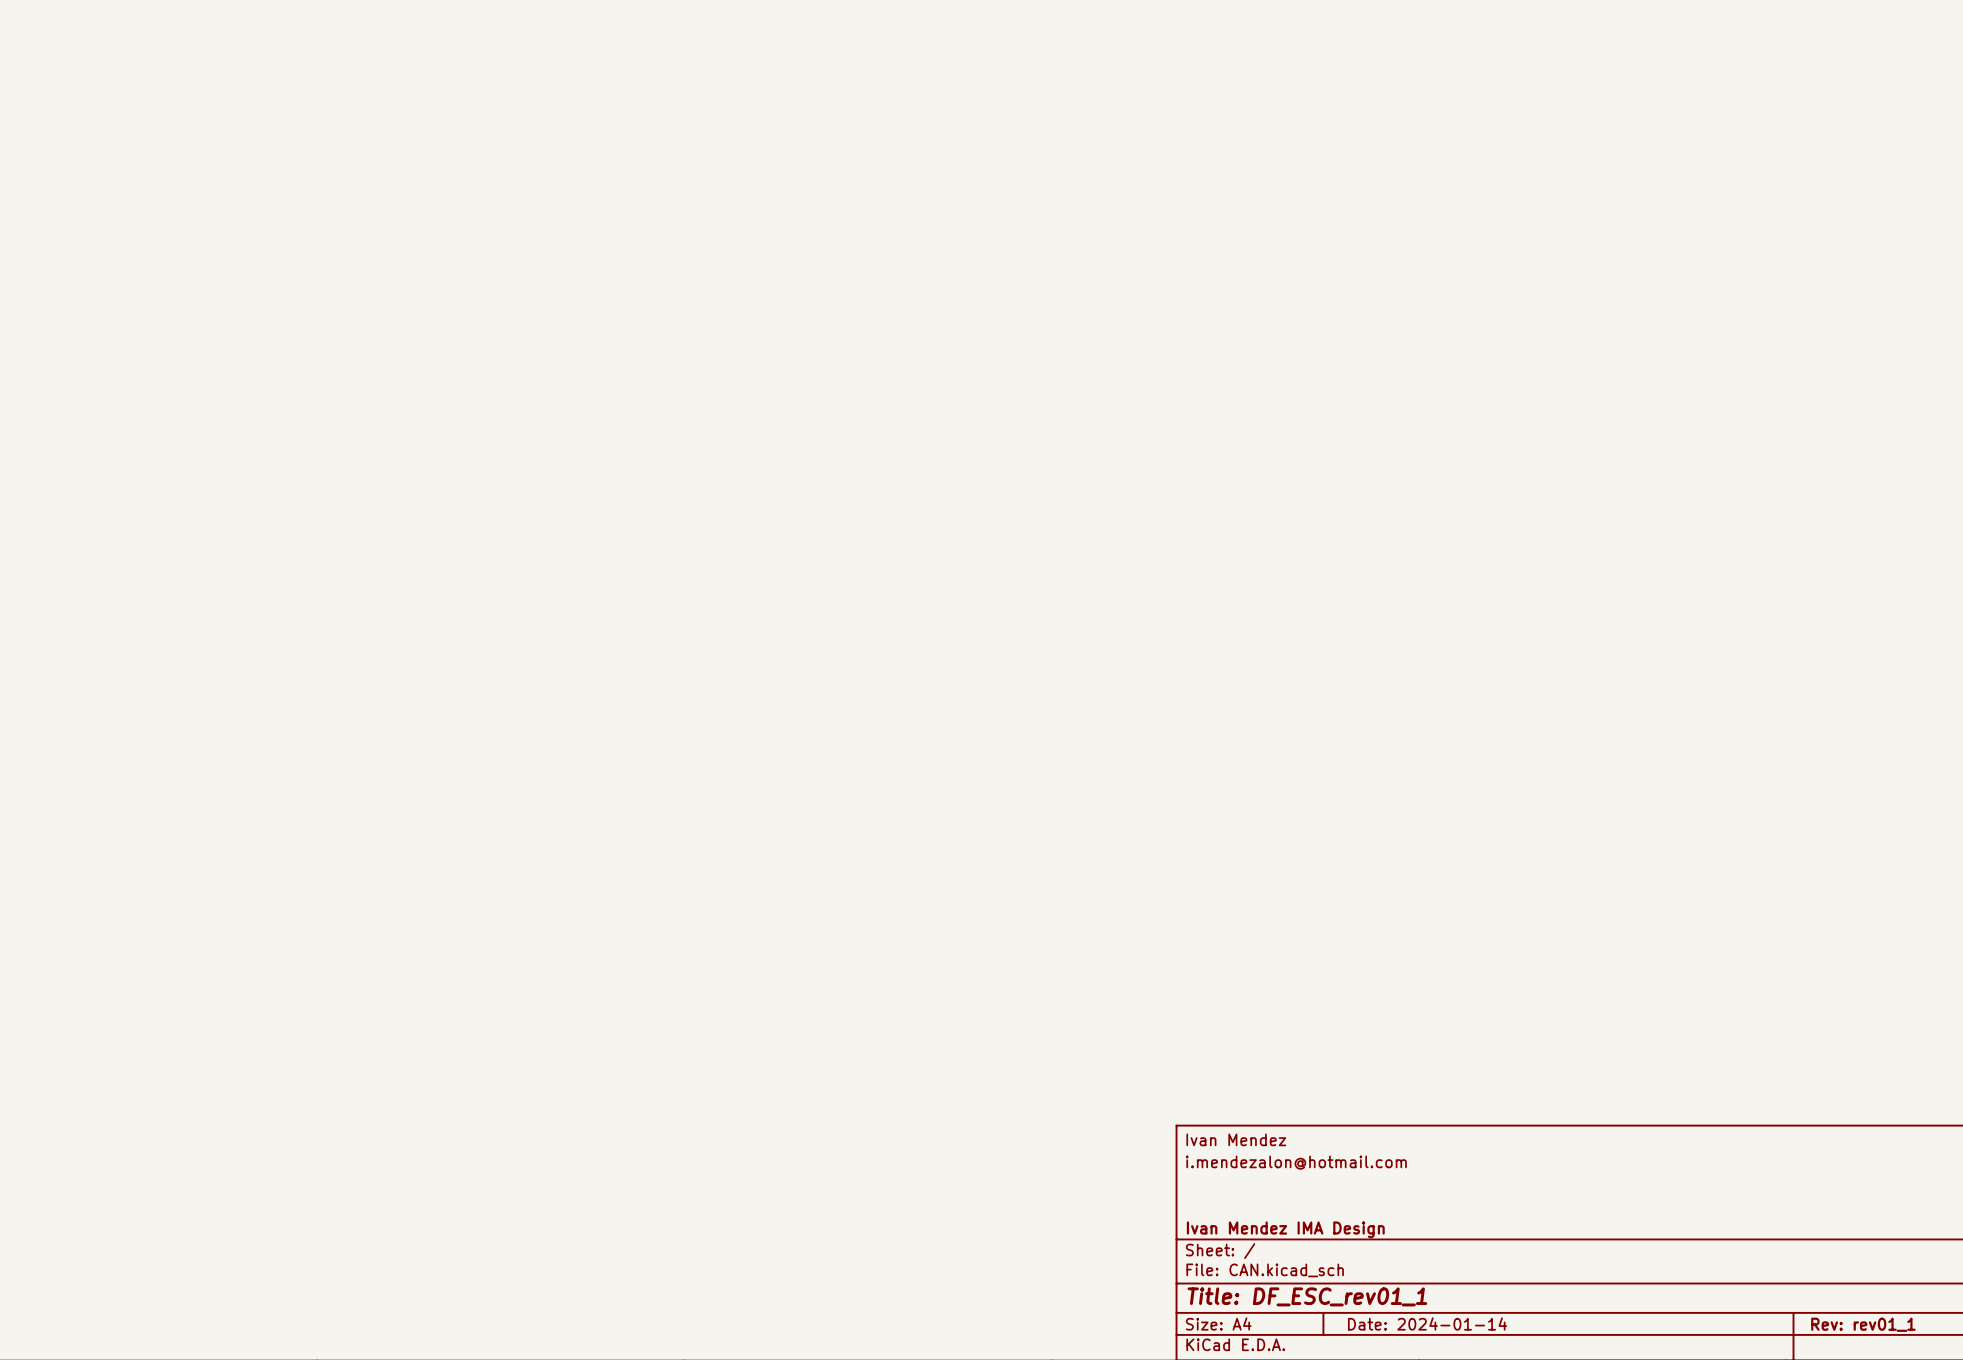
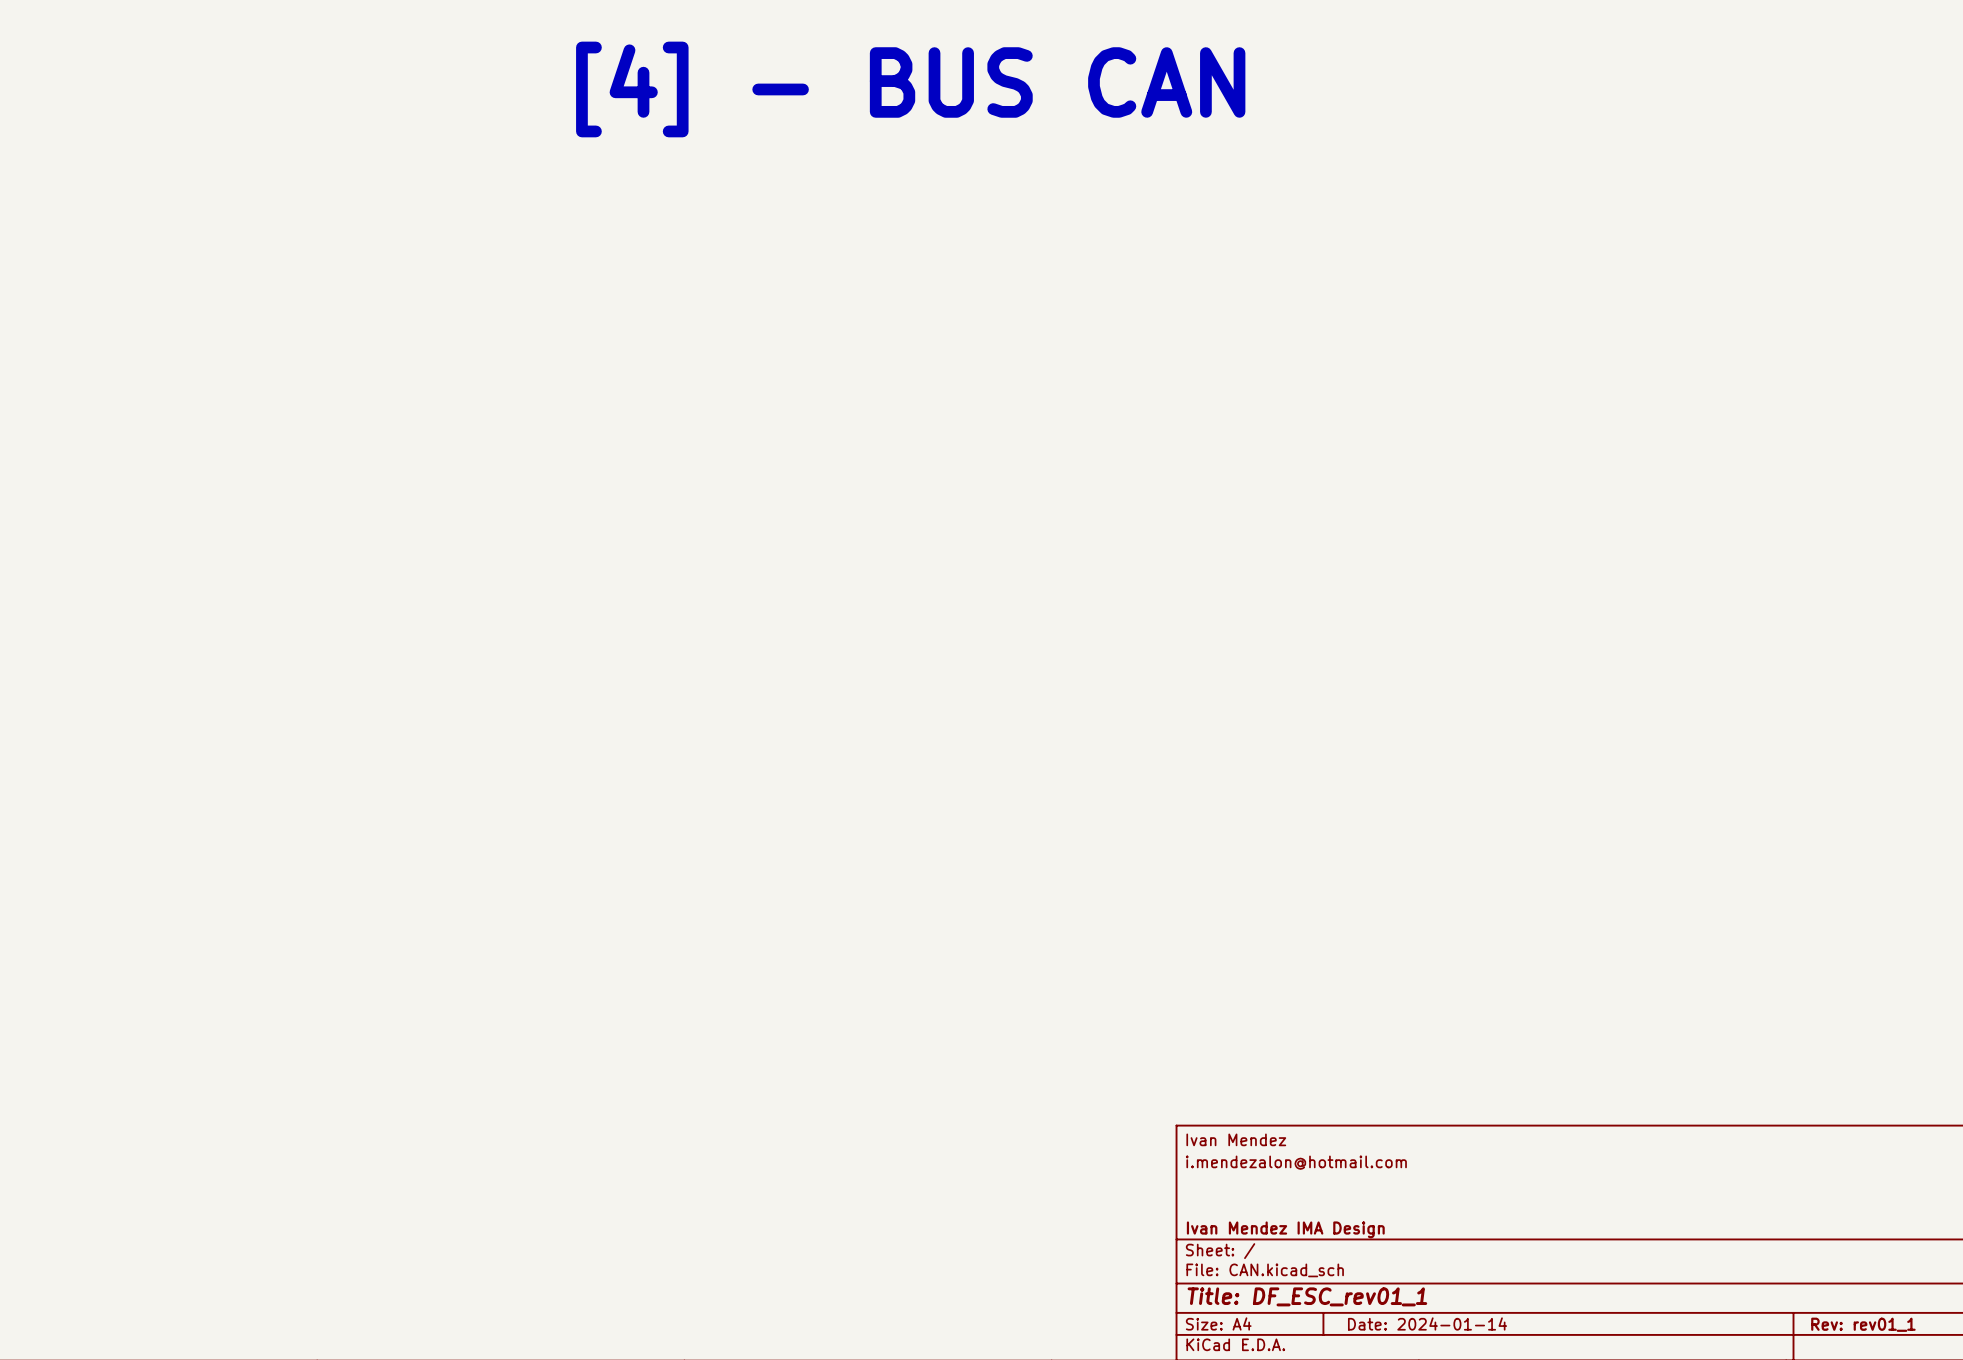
text: none -> [4] - BUS CAN (910, 89)

